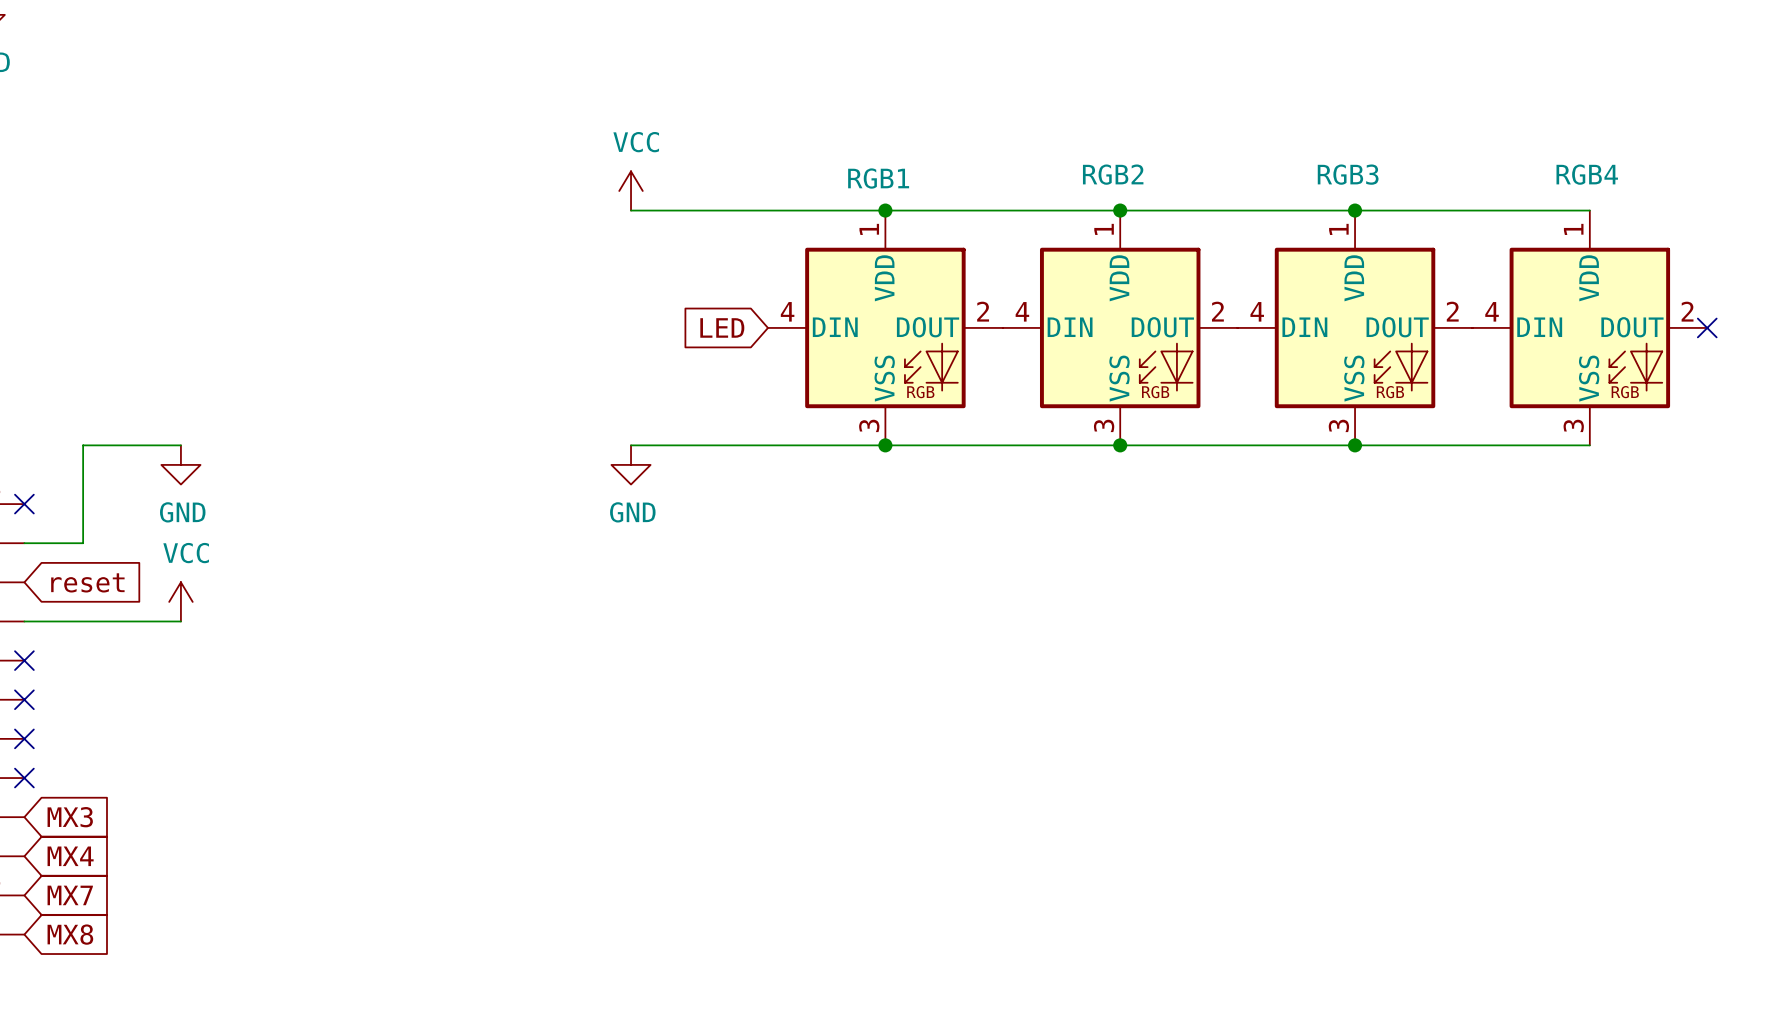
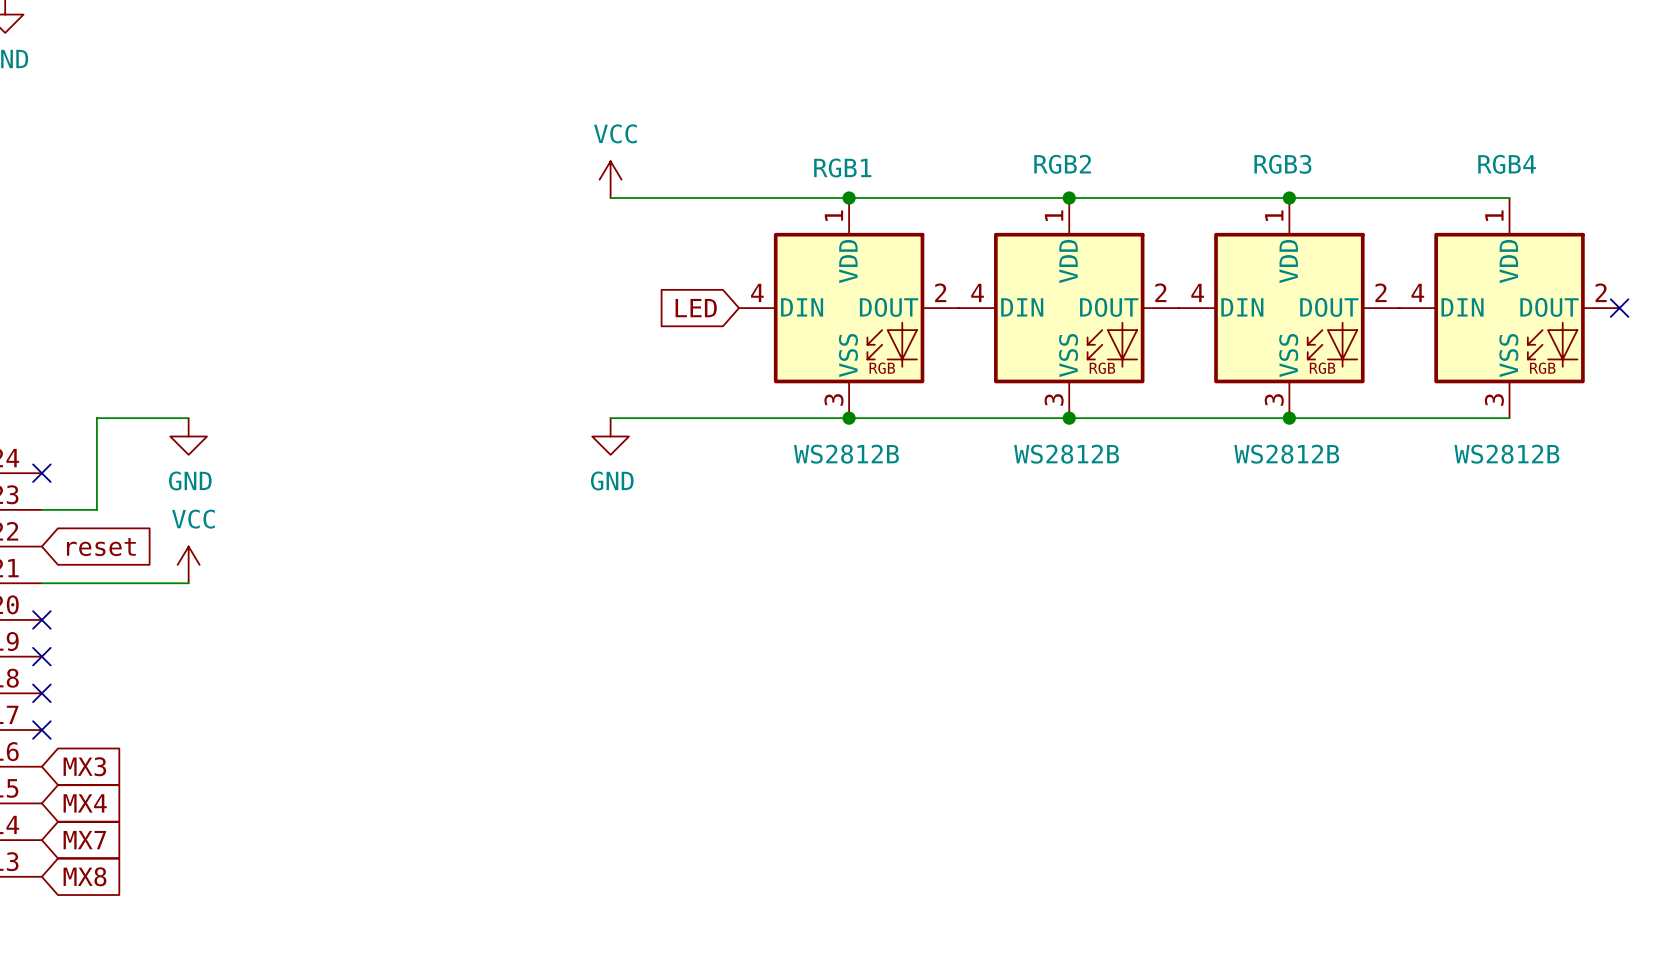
RGB1 value: none -> WS2812B (846, 454)
RGB2 value: none -> WS2812B (1066, 454)
RGB3 value: none -> WS2812B (1286, 454)
RGB4 value: none -> WS2812B (1506, 454)

